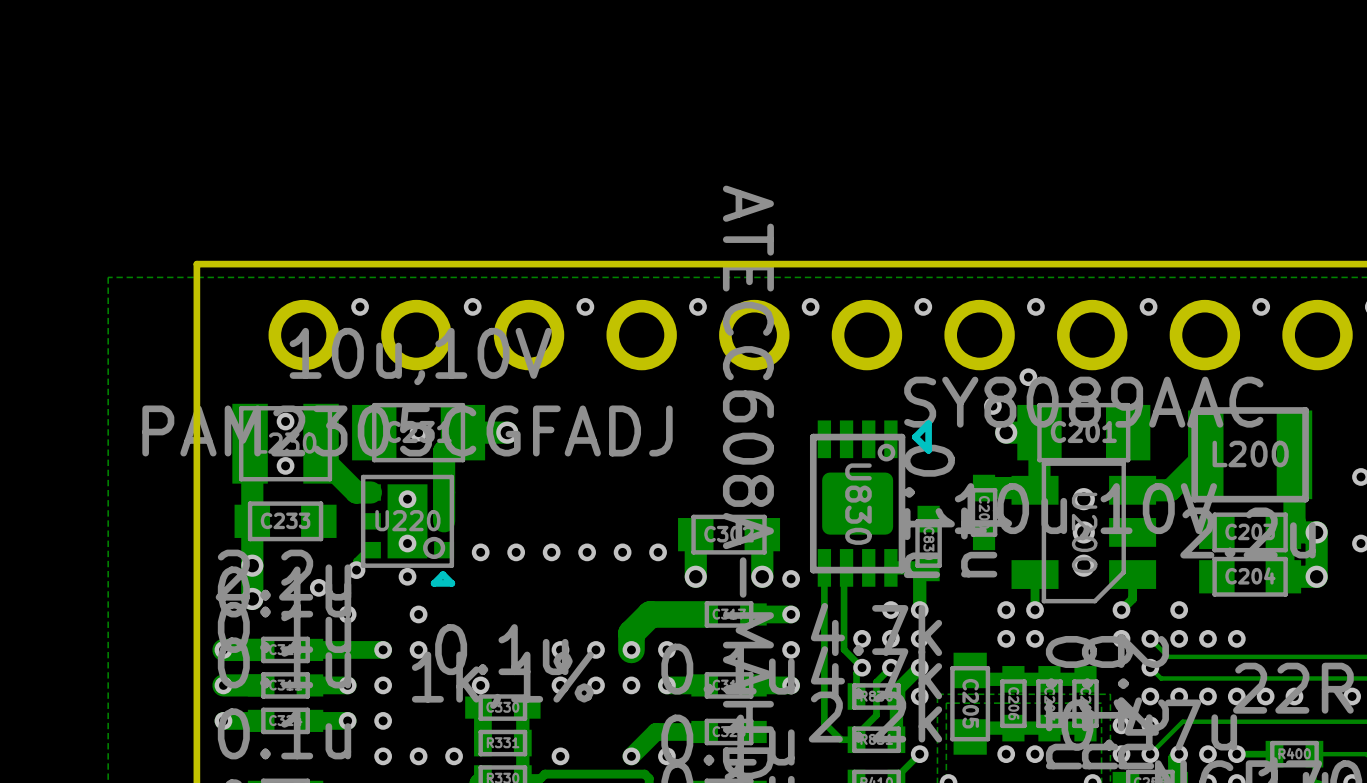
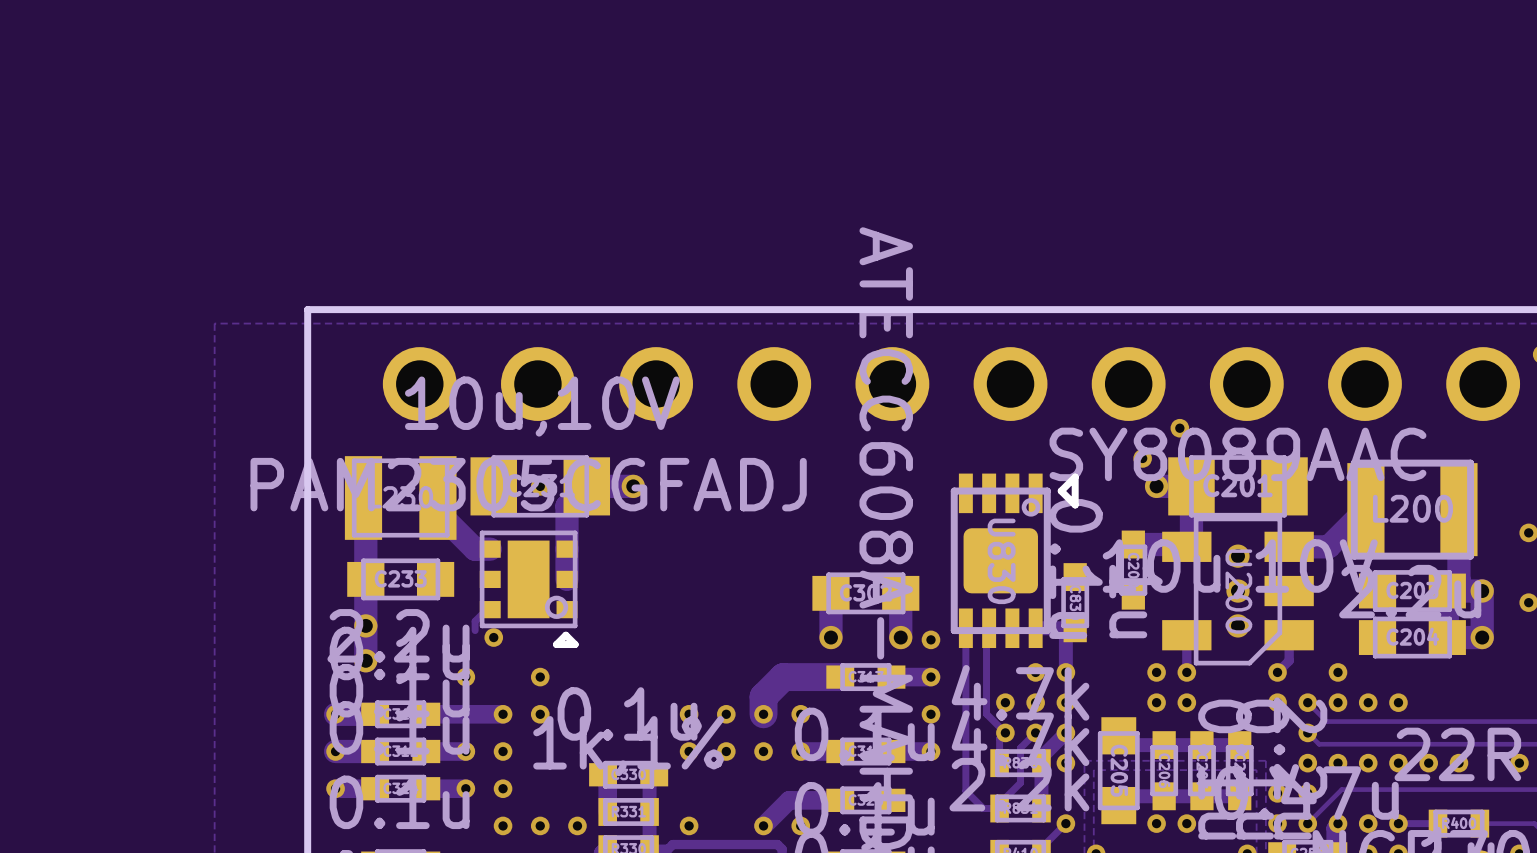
via: (360, 306) -> none
via: (472, 306) -> none
via: (585, 306) -> none
via: (697, 306) -> none
via: (810, 306) -> none
via: (923, 306) -> none
via: (1035, 306) -> none
via: (1148, 306) -> none
via: (1261, 306) -> none
via: (285, 421) -> none
via: (285, 465) -> none
via: (407, 499) -> none
part text: U220 (407, 520) -> none
via: (407, 543) -> none
via: (480, 552) -> none
via: (516, 552) -> none
via: (551, 552) -> none
via: (587, 552) -> none
via: (622, 552) -> none
via: (658, 552) -> none
via position: (356, 570) -> (493, 637)
via: (407, 576) -> none
via: (318, 587) -> none
via: (480, 685) -> none

